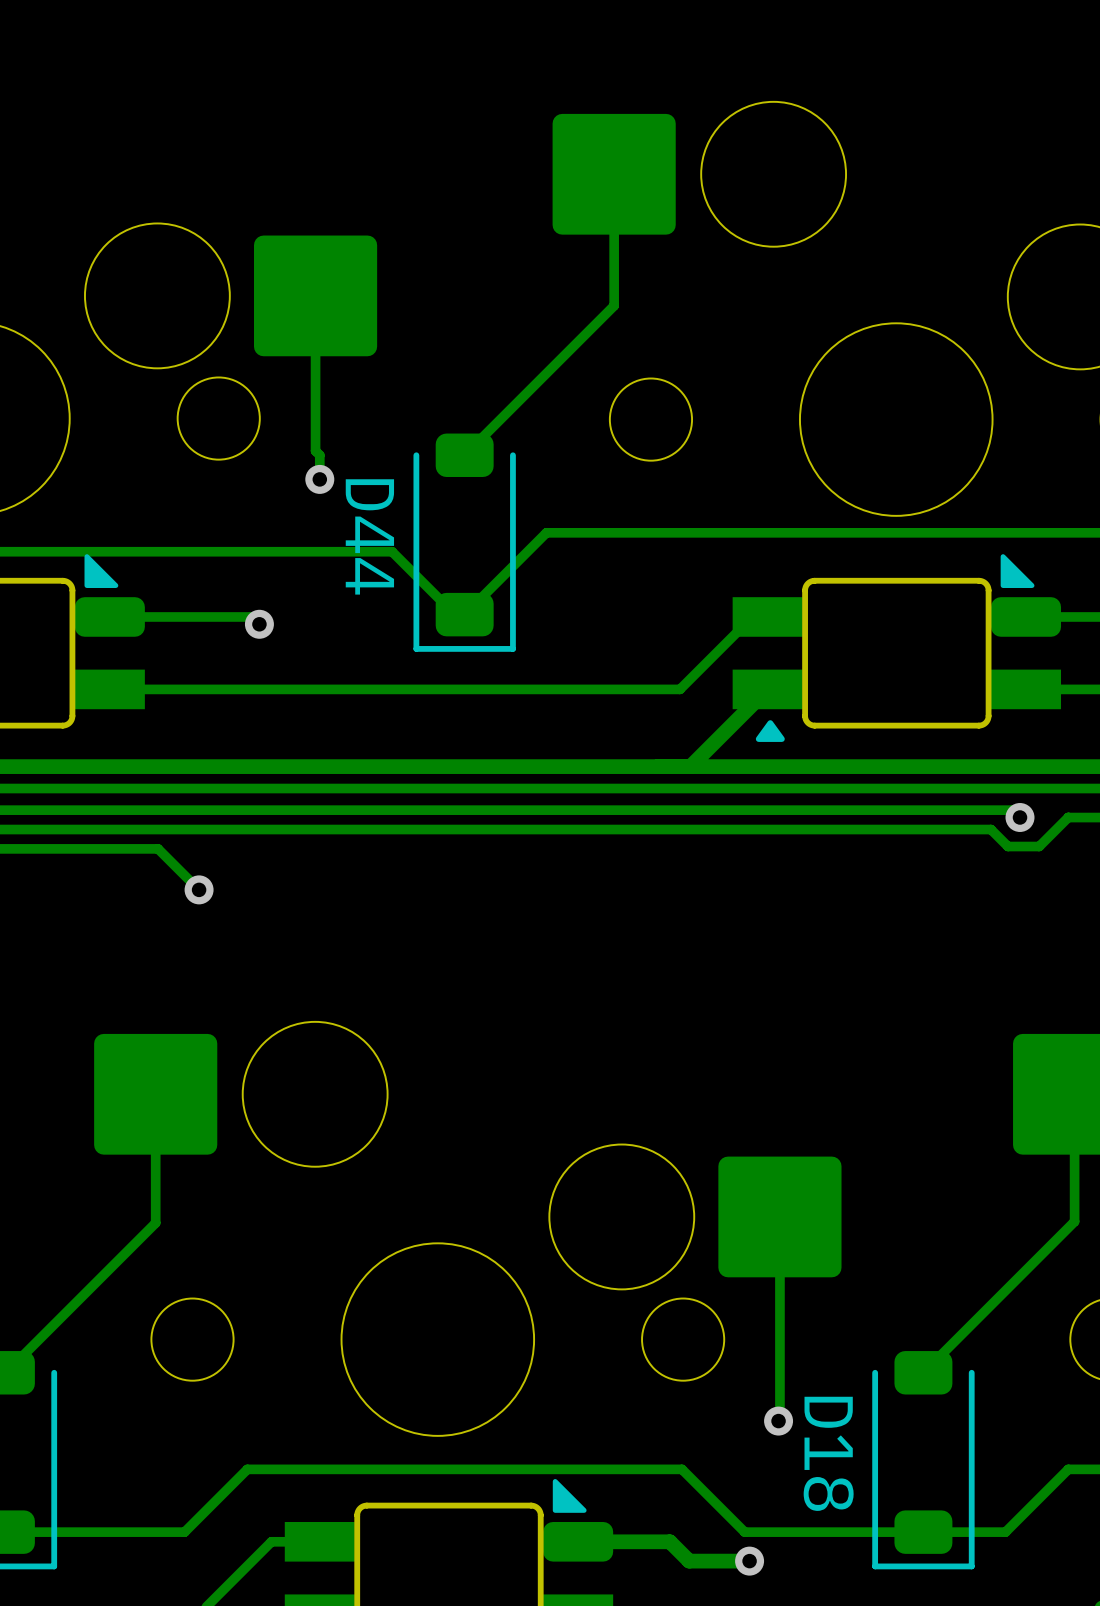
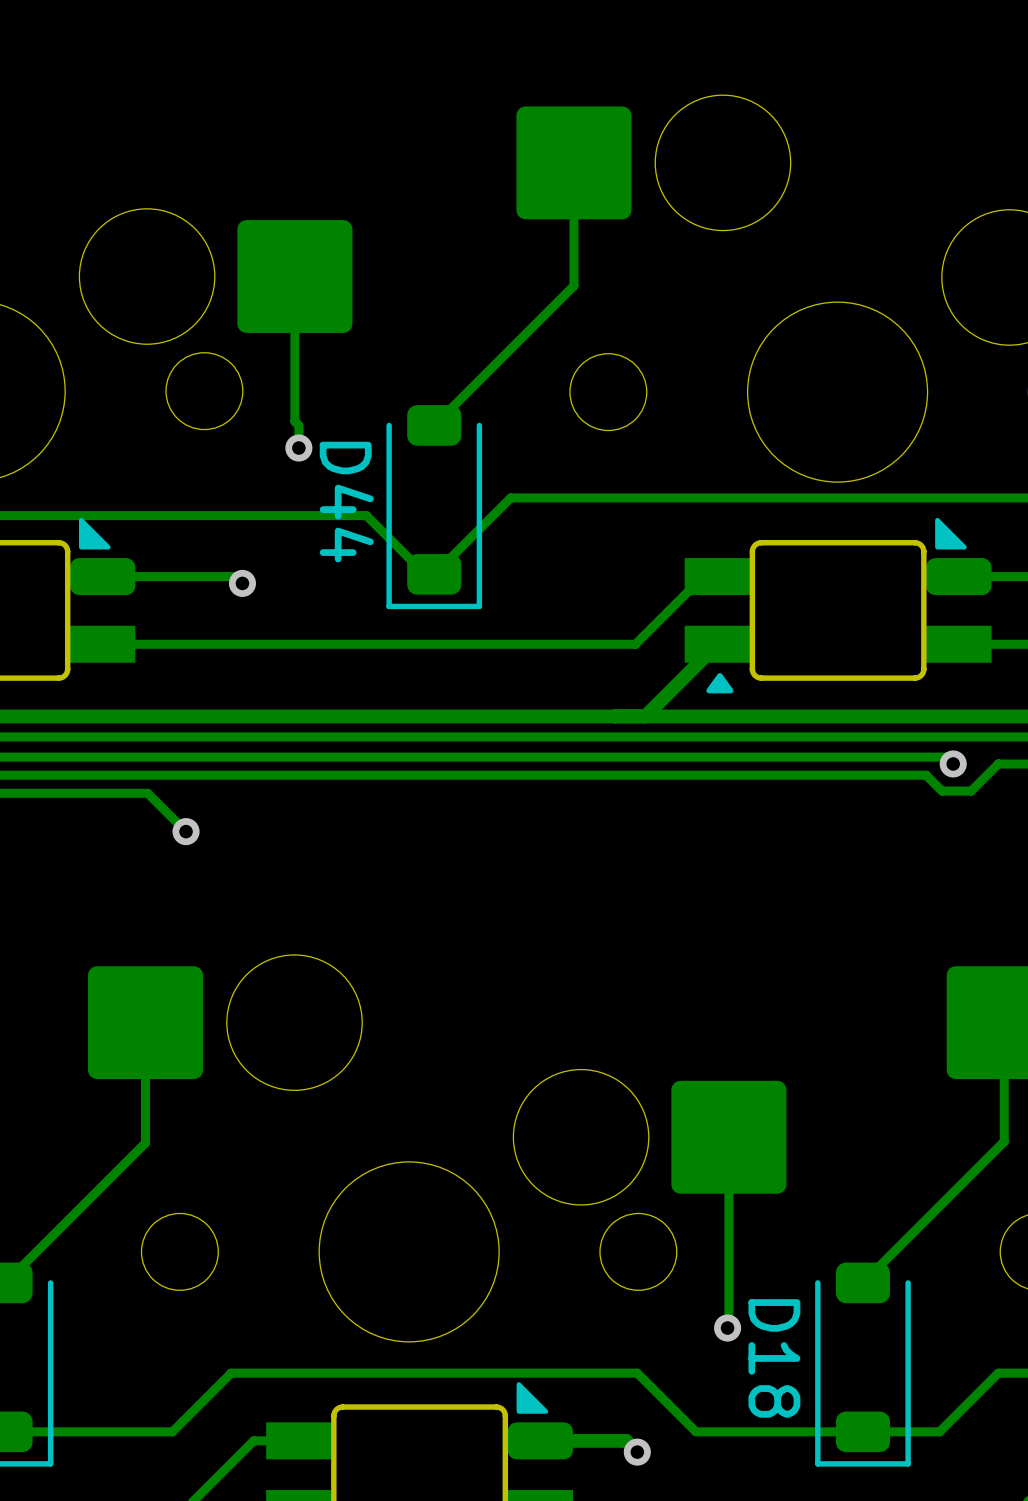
track: (681, 1553) (689, 1561) (749, 1561) -> none
via position: (749, 1561) -> (637, 1452)

